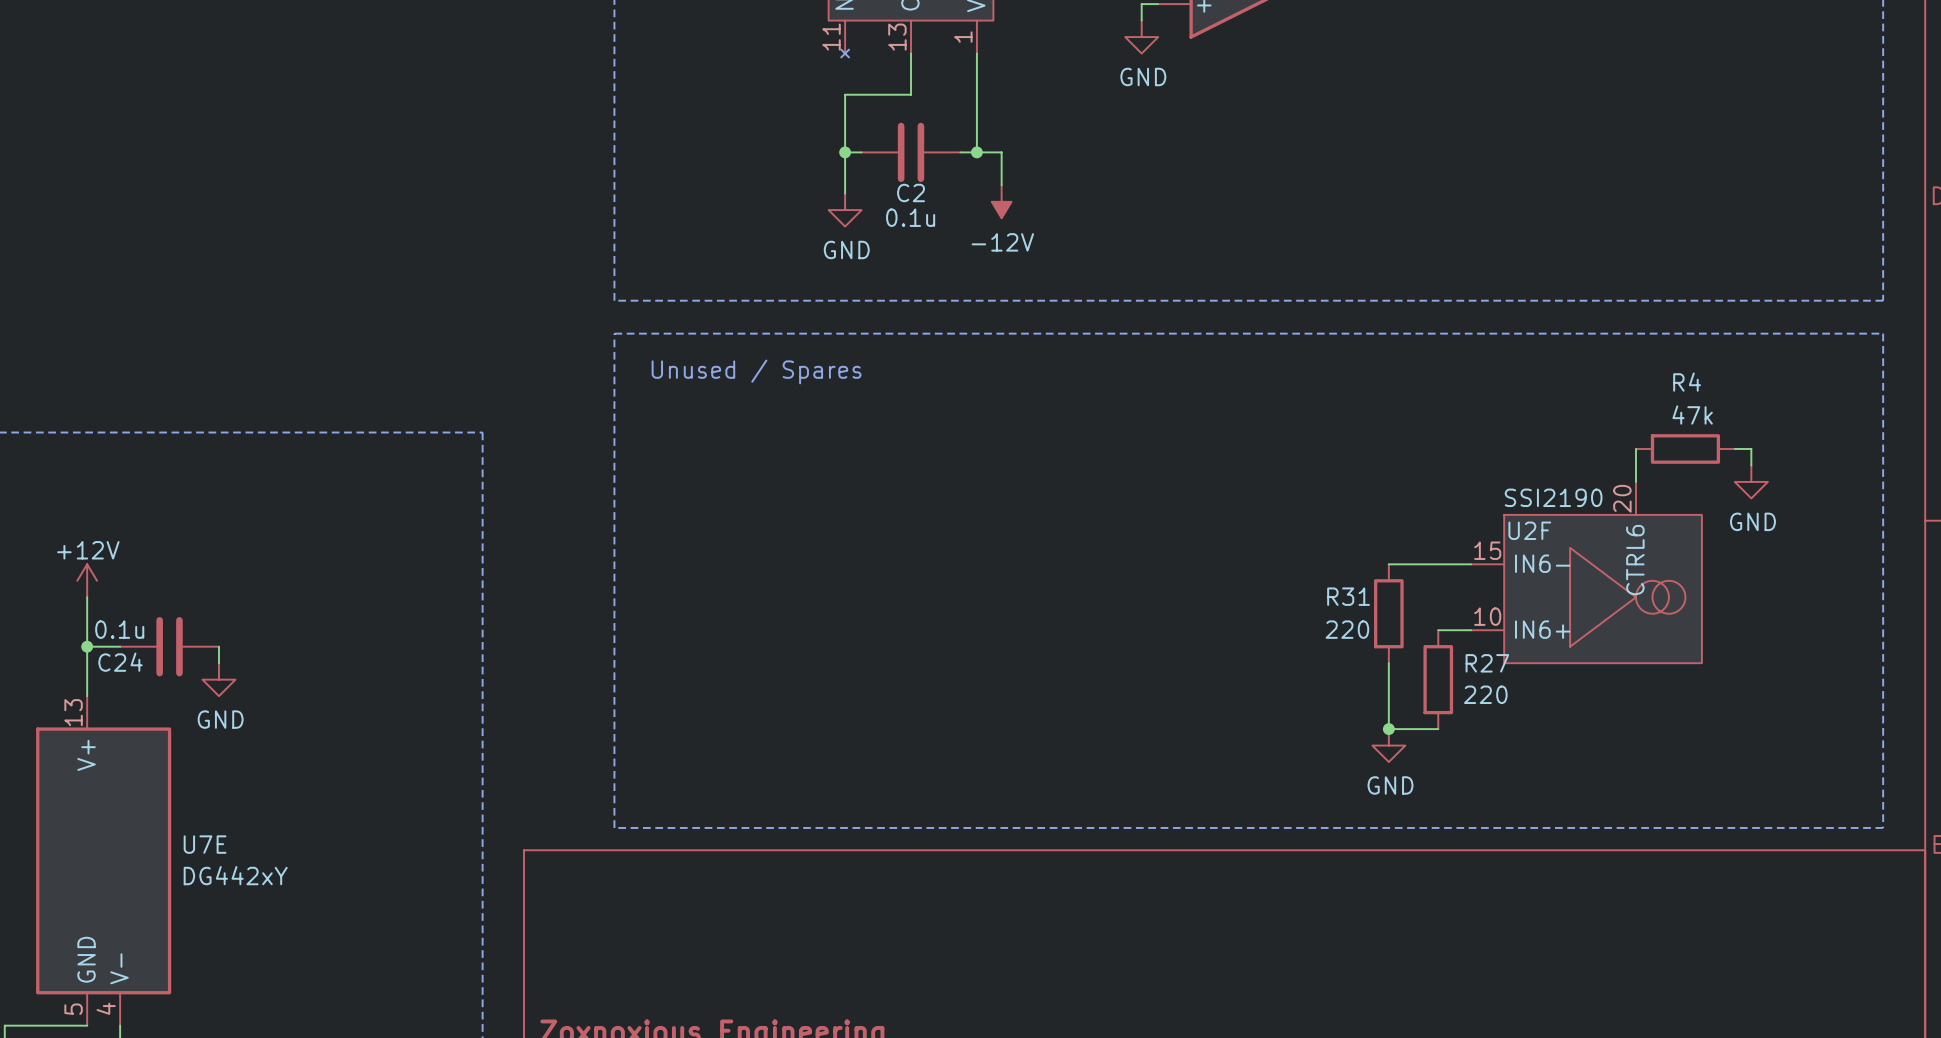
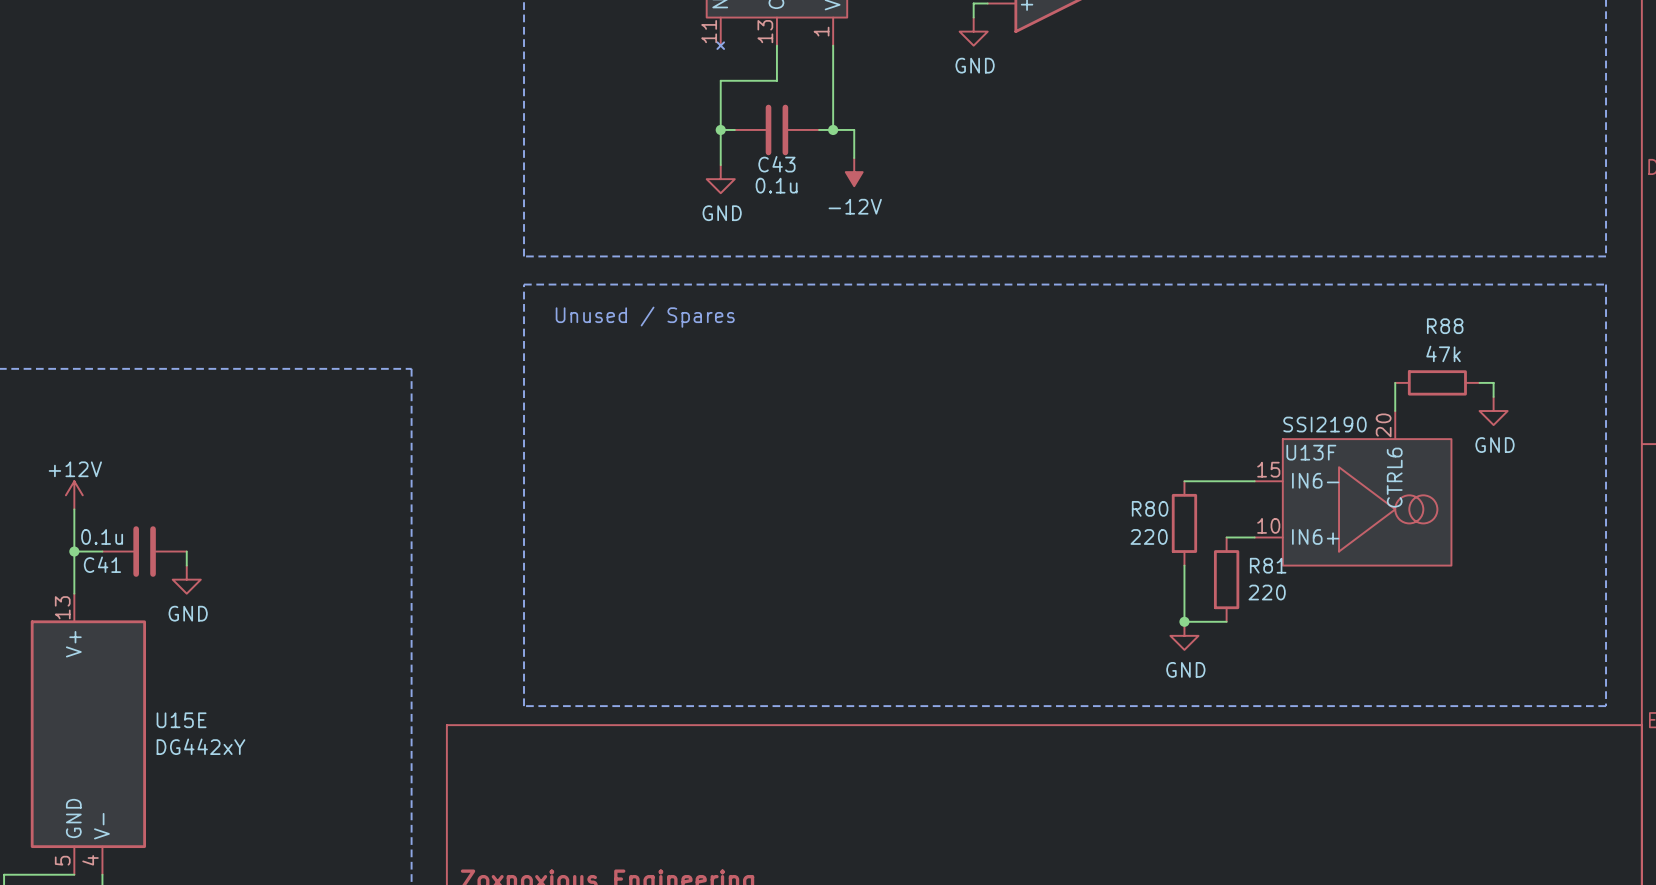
C2 name: C2 (911, 192) -> C43 (776, 164)
R4 name: R4 (1687, 382) -> R88 (1445, 326)
U2F name: U2F (1529, 530) -> U13F (1311, 452)
R31 name: R31 (1348, 596) -> R80 (1150, 508)
C24 name: C24 (120, 662) -> C41 (102, 564)
R27 name: R27 (1487, 663) -> R81 (1268, 565)
U7E name: U7E (205, 844) -> U15E (181, 720)

